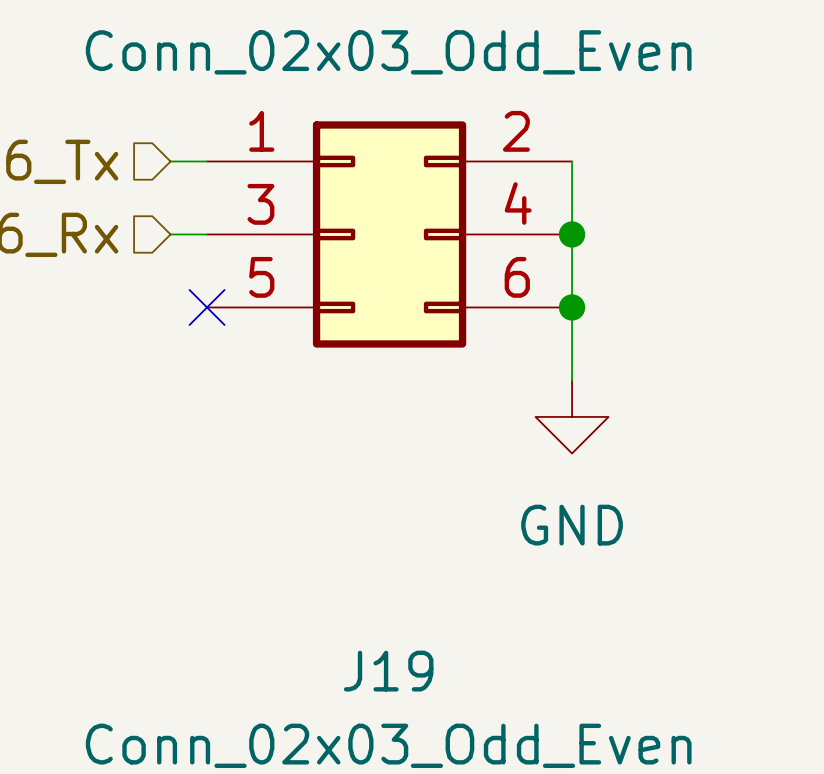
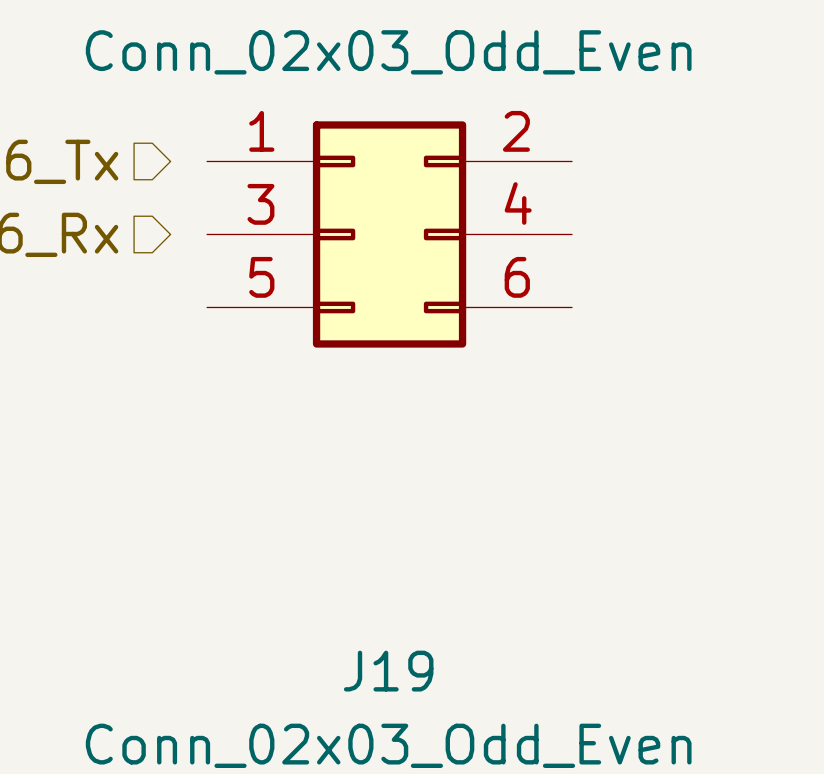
wire: (170, 161) (207, 161) -> none
wire: (572, 161) (572, 380) -> none
wire: (170, 234) (207, 234) -> none
junction: (572, 234) -> none
no-connect mark: (207, 307) -> none
junction: (572, 307) -> none
power symbol: GND (572, 416) -> none

